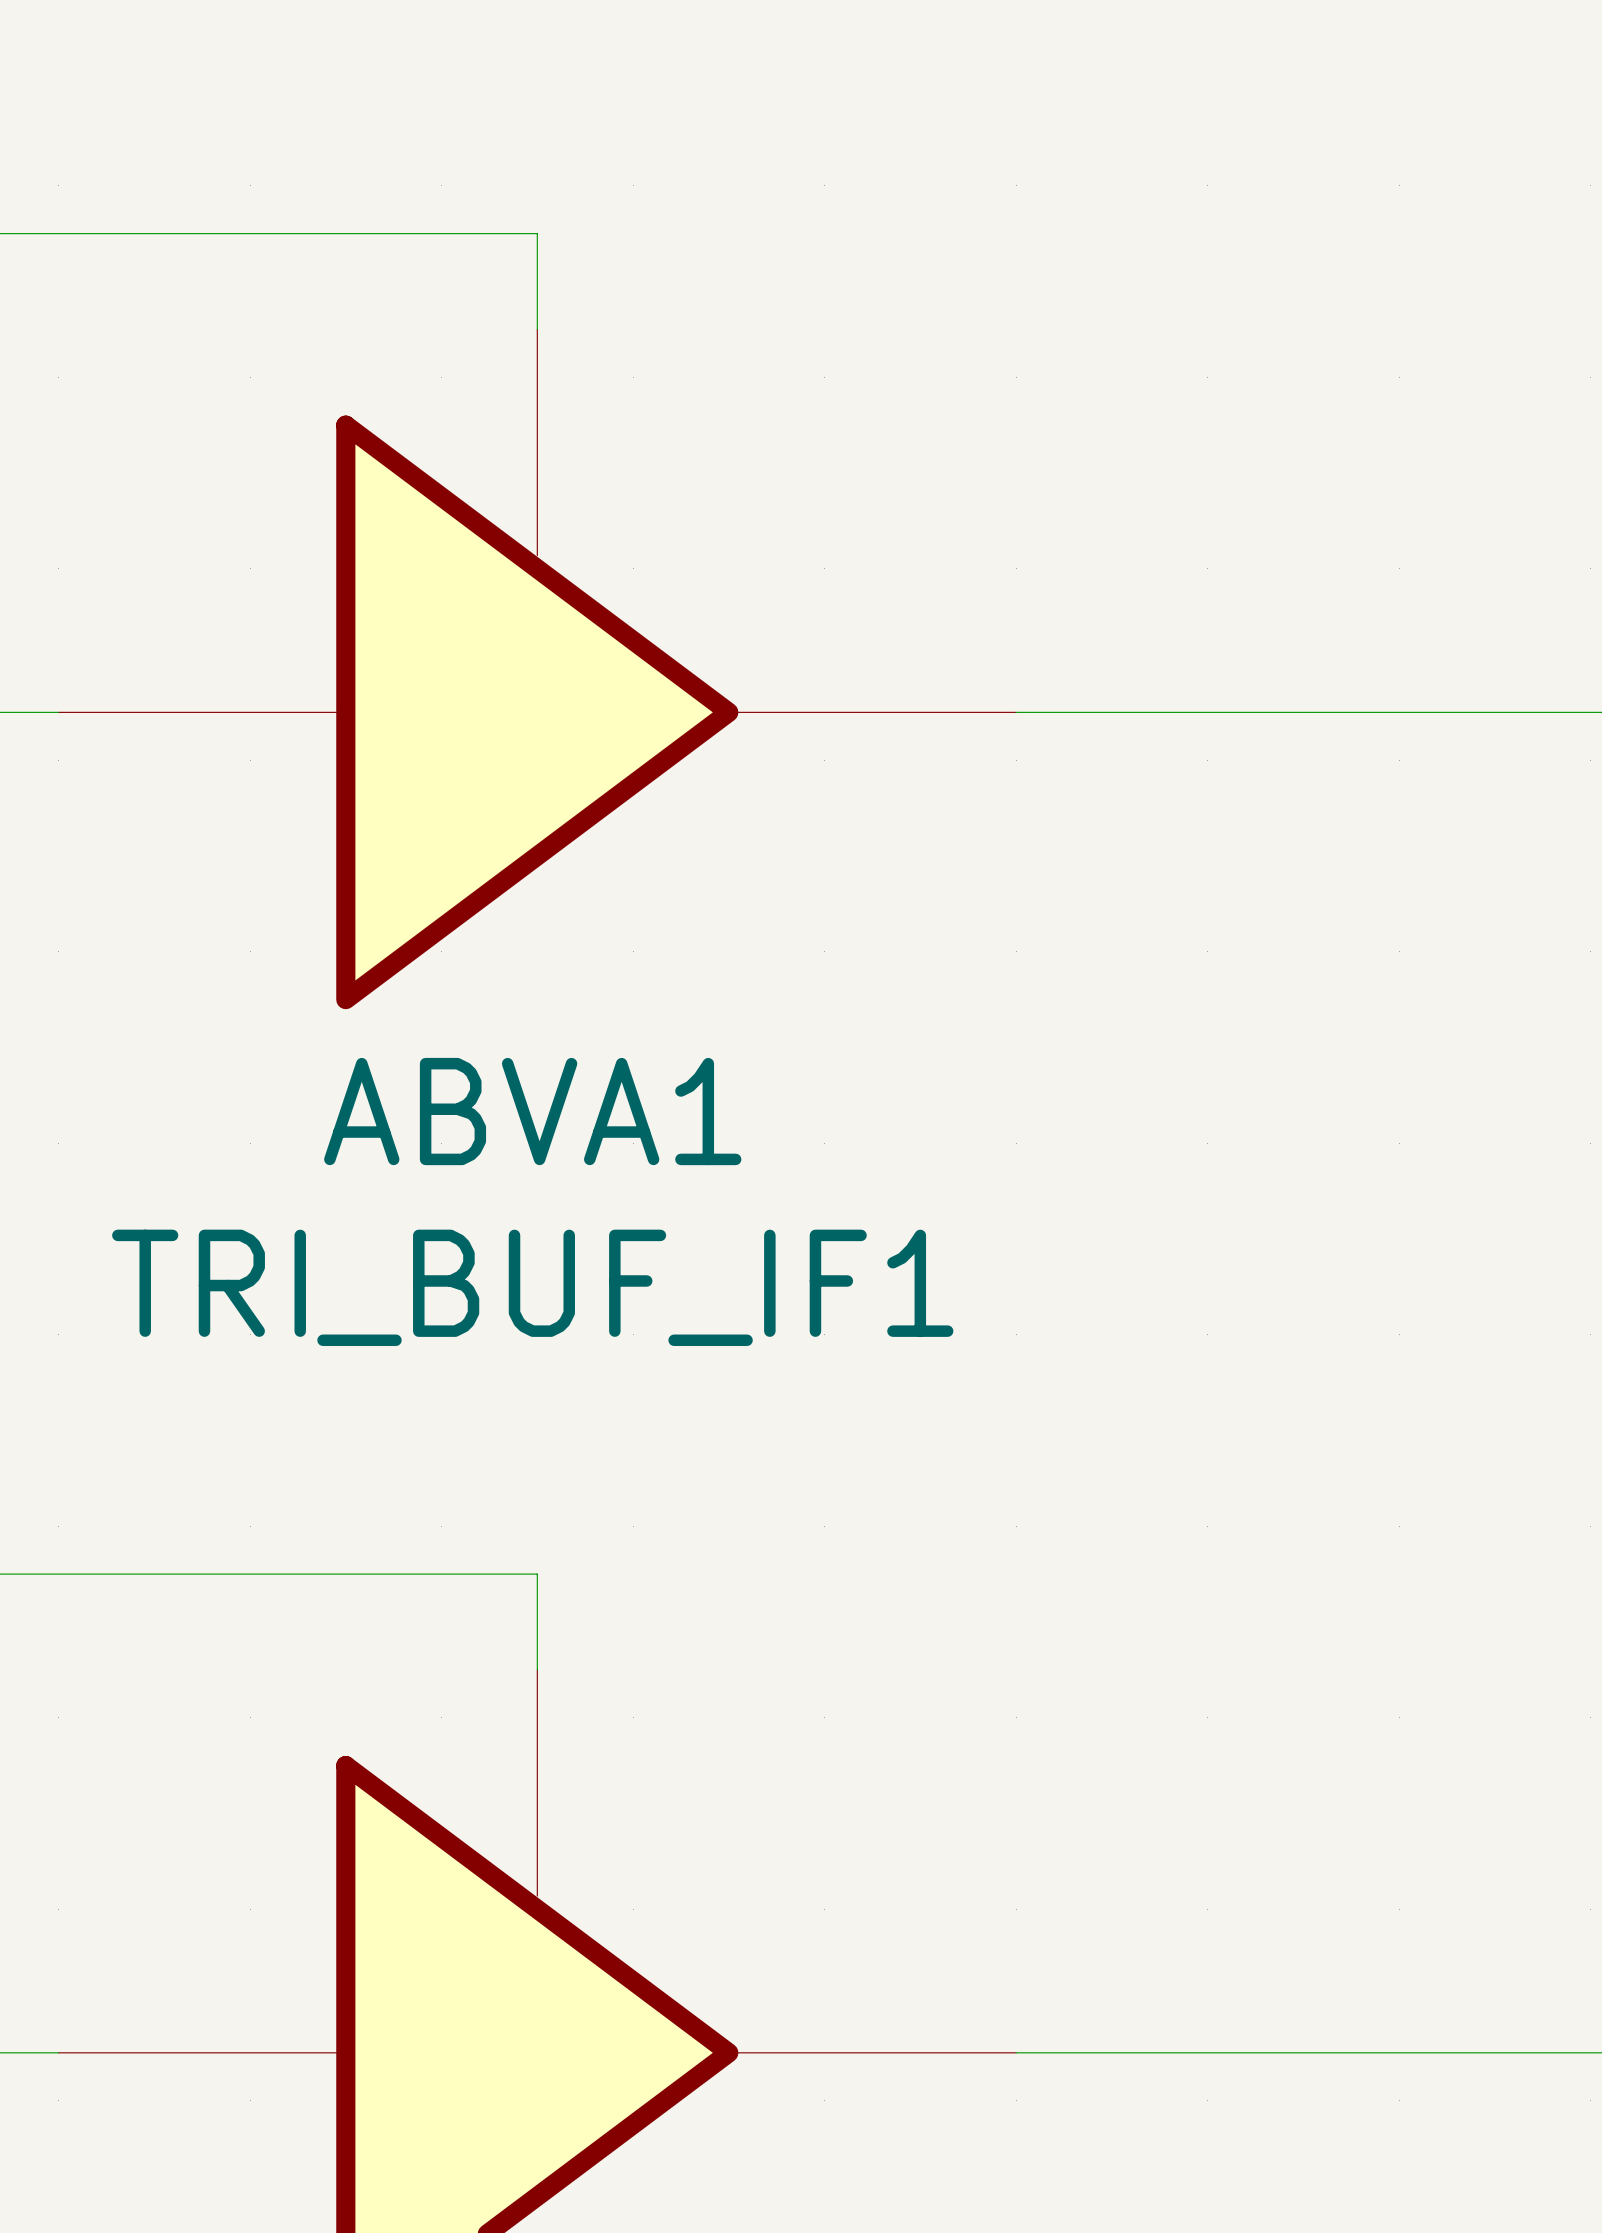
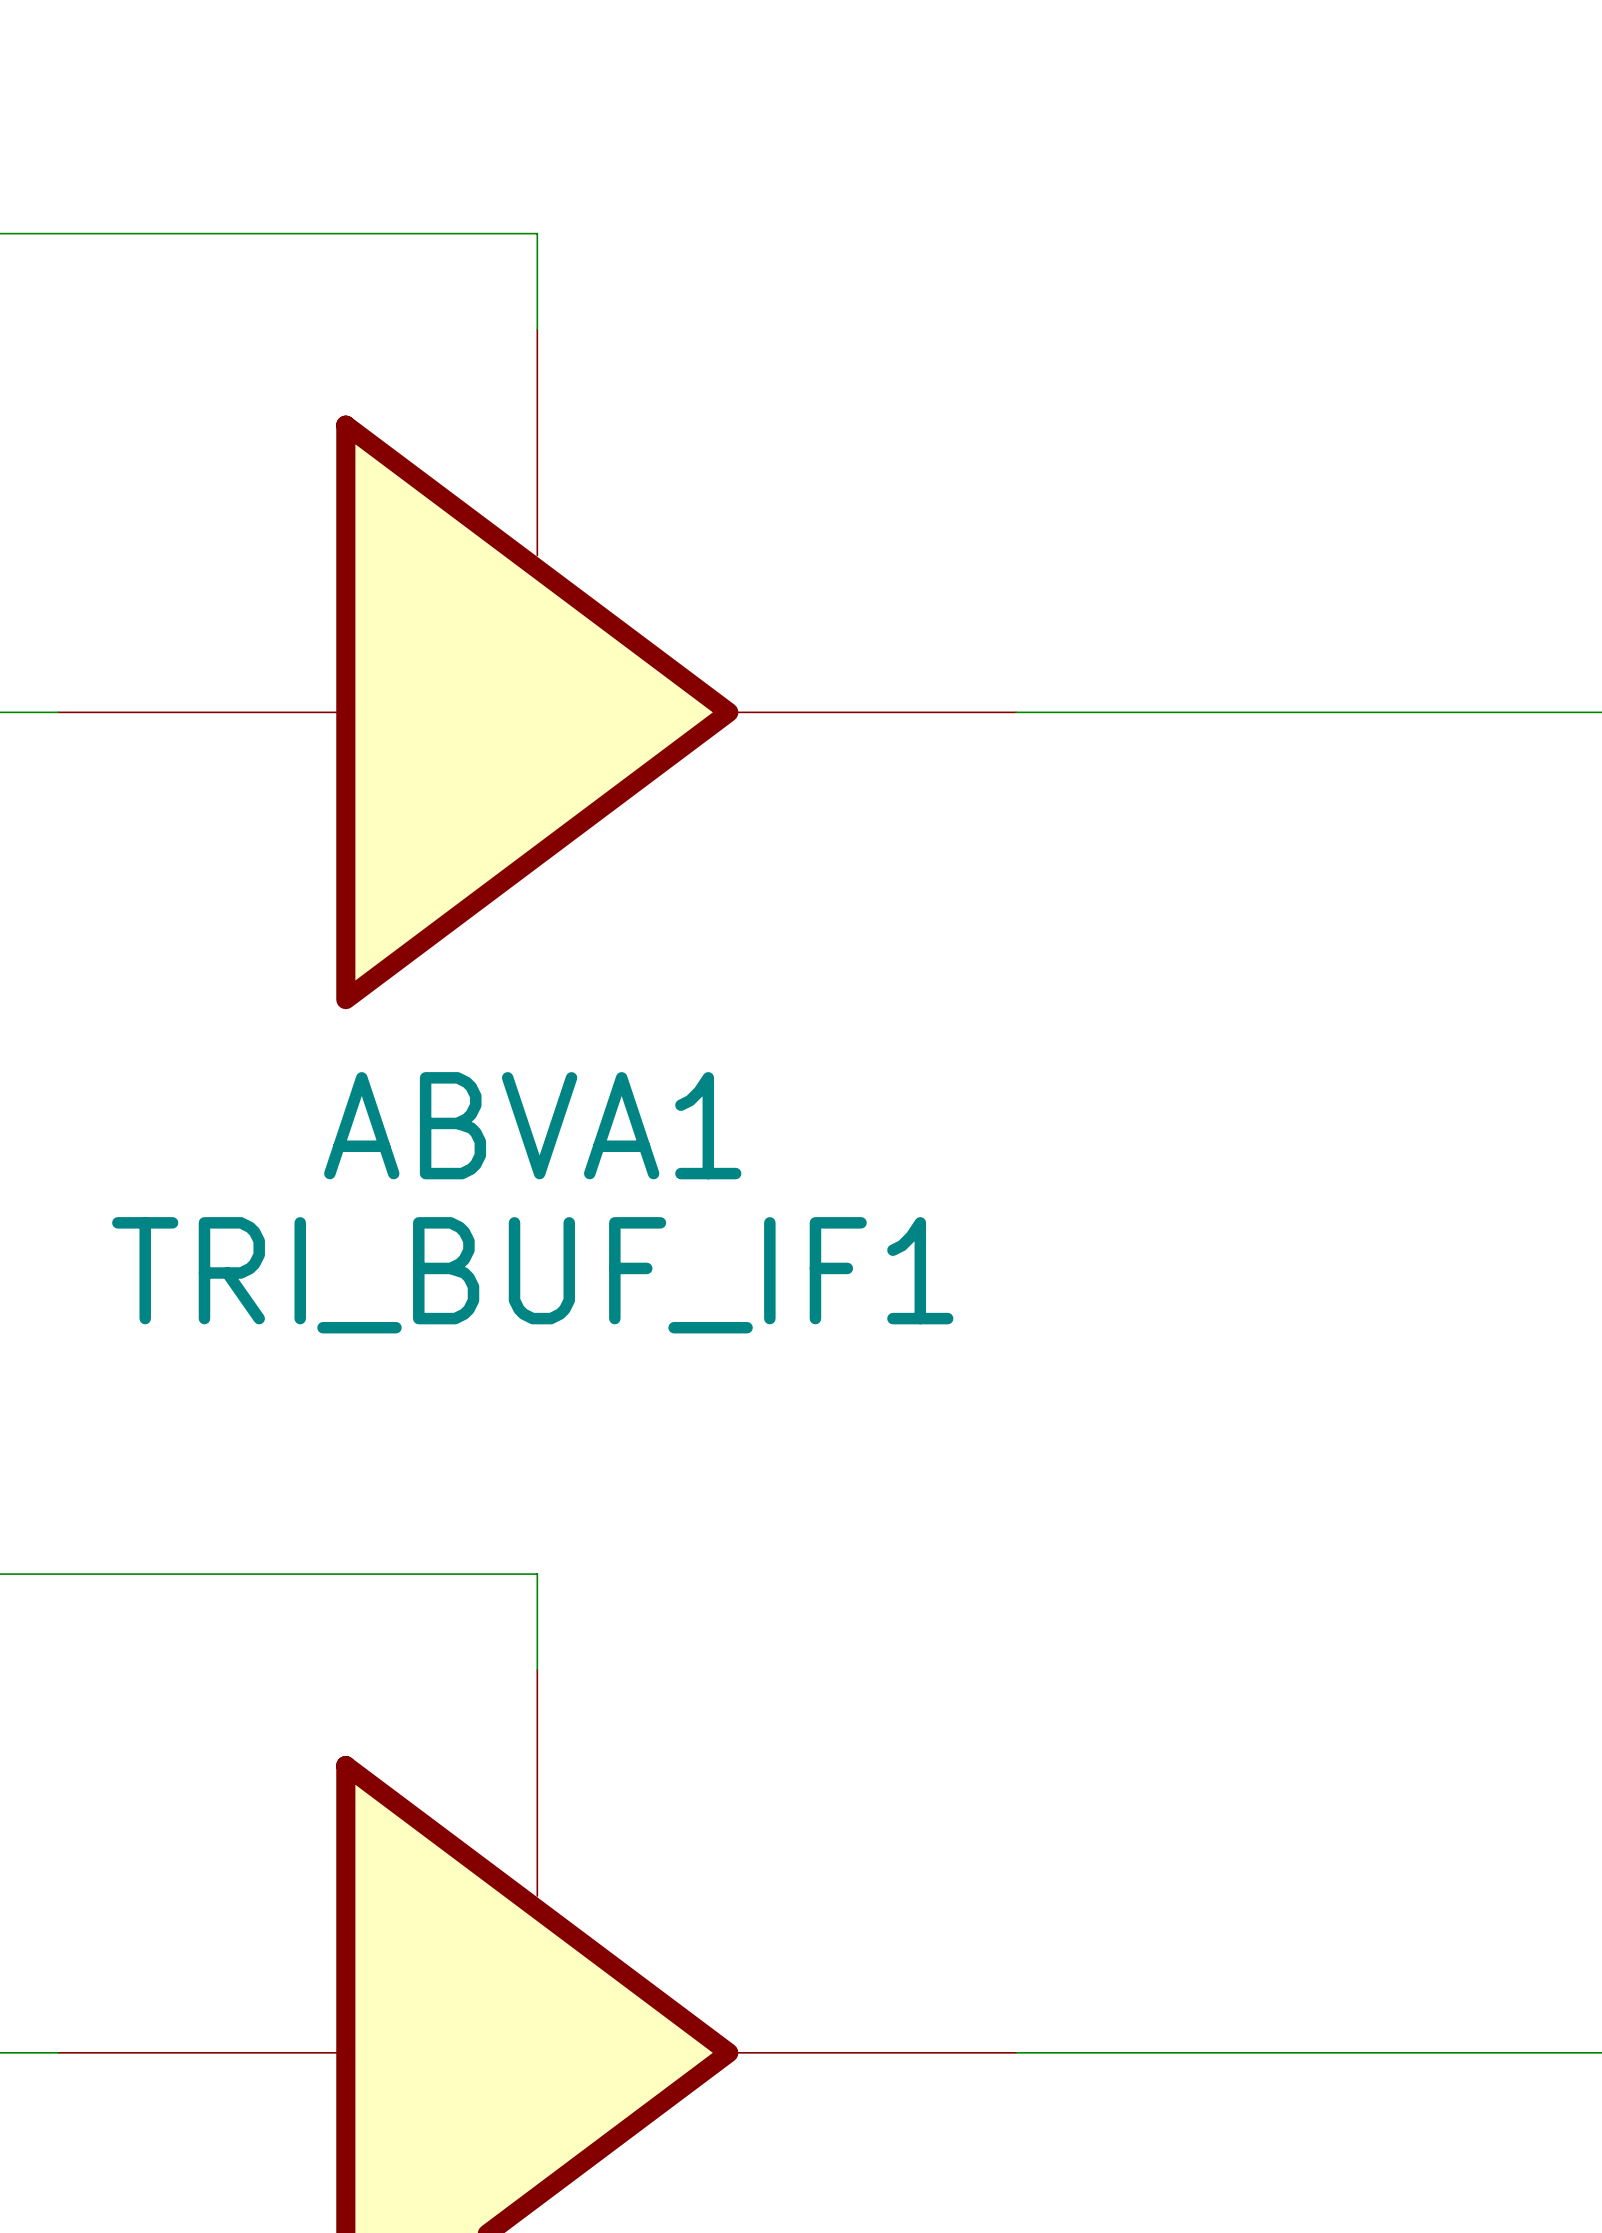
ABVA1 name position: ABVA1 (532, 1111) -> ABVA1 (532, 1125)
ABVA1 value position: TRI_BUF_IF1 (532, 1287) -> TRI_BUF_IF1 (532, 1275)

